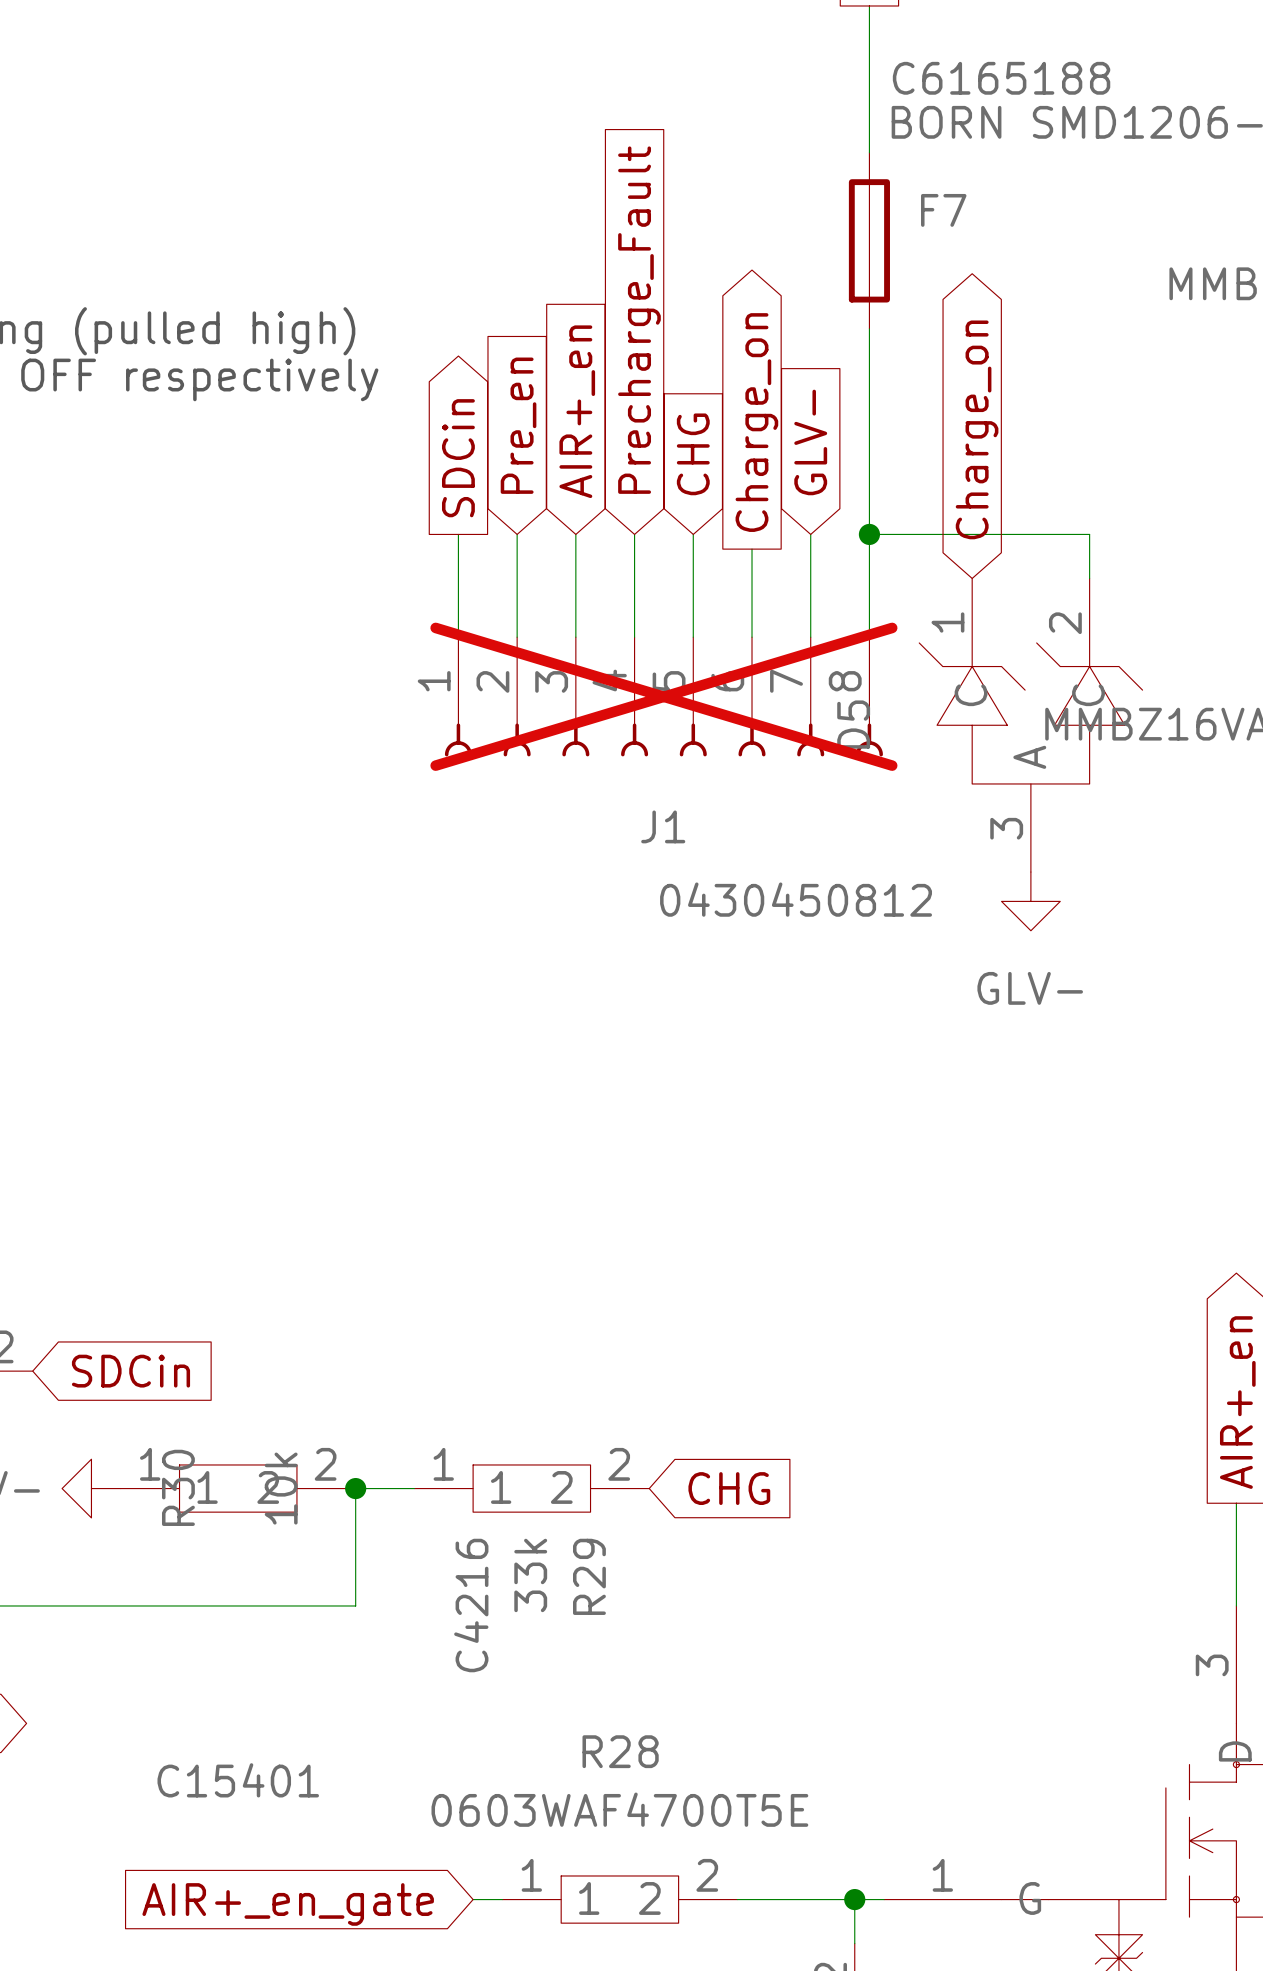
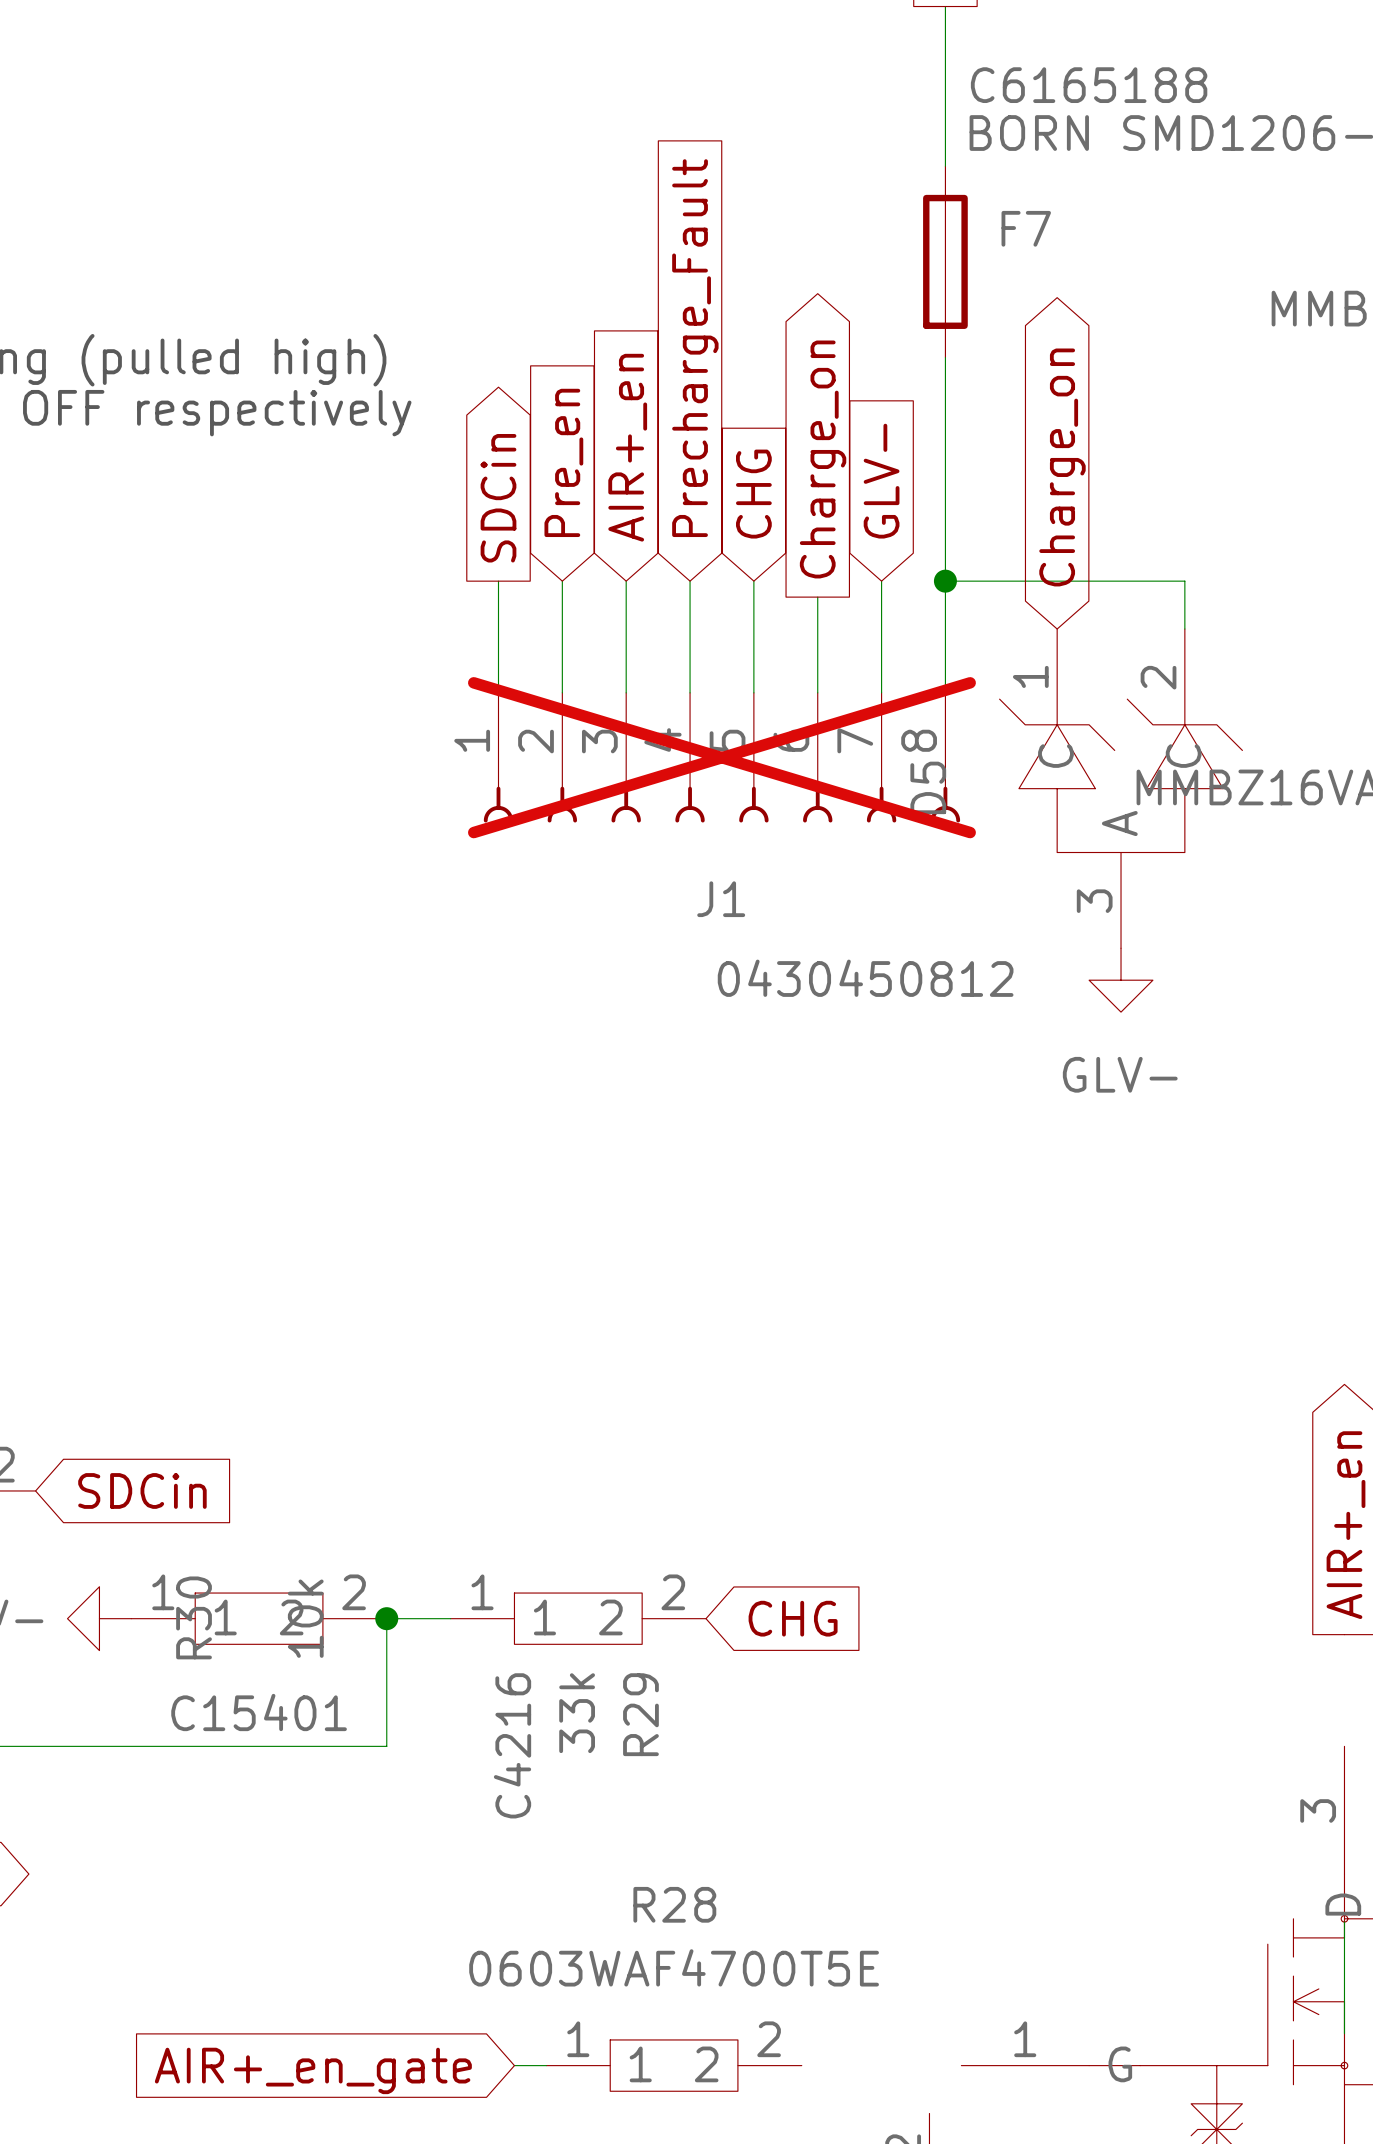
wire: (1236, 1503) (1236, 1605) -> (1344, 1921) (1344, 2033)
R30 text position: C15401 (238, 1780) -> C15401 (259, 1712)
wire: (737, 1899) (884, 1899) -> none
wire: (854, 1899) (854, 1943) -> none
junction: (854, 1899) -> none

